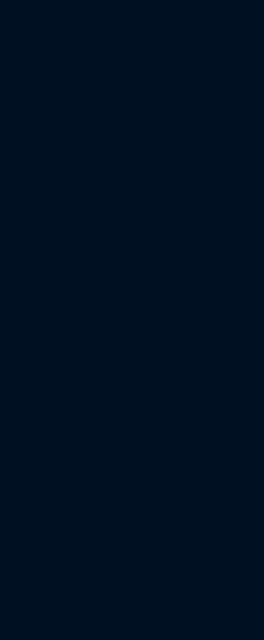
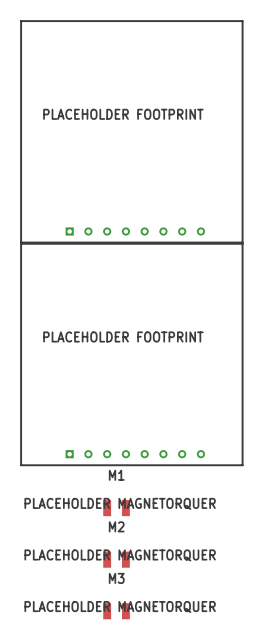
part: none -> (131, 131)
part: none -> (131, 354)
M1: none -> (116, 508)
M2: none -> (116, 559)
M3: none -> (116, 611)

